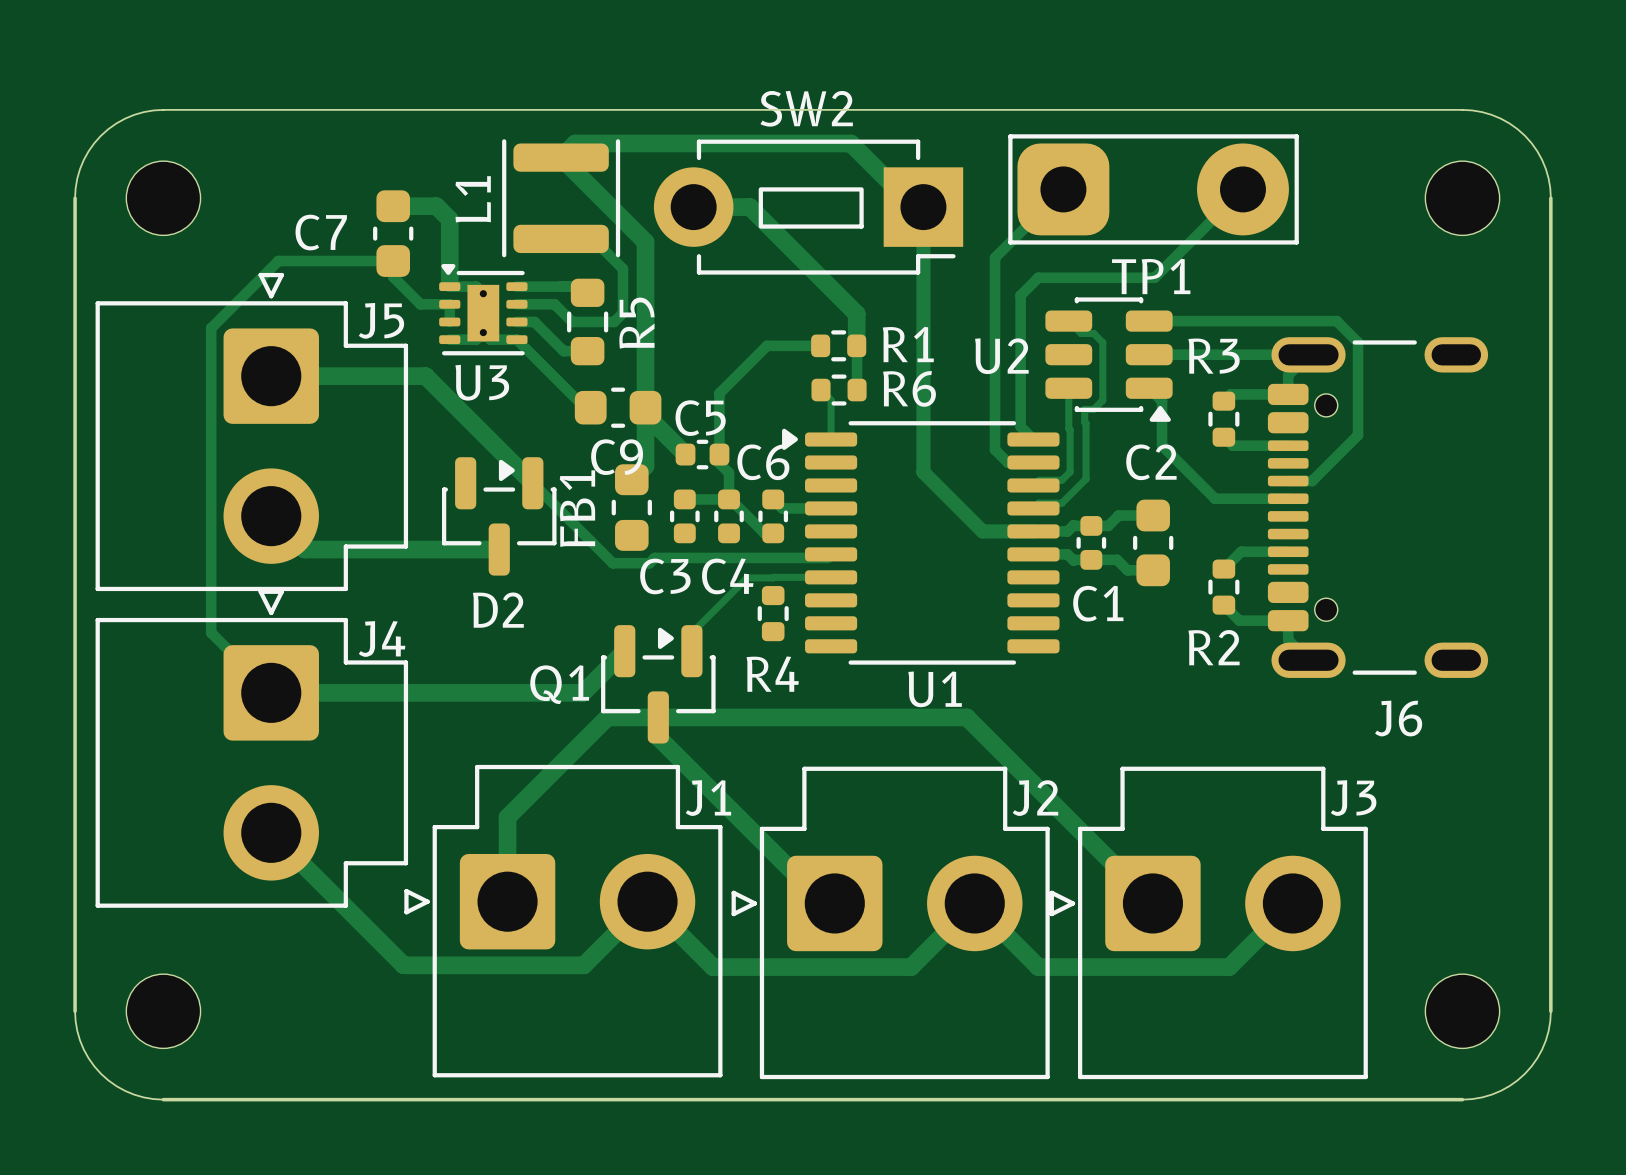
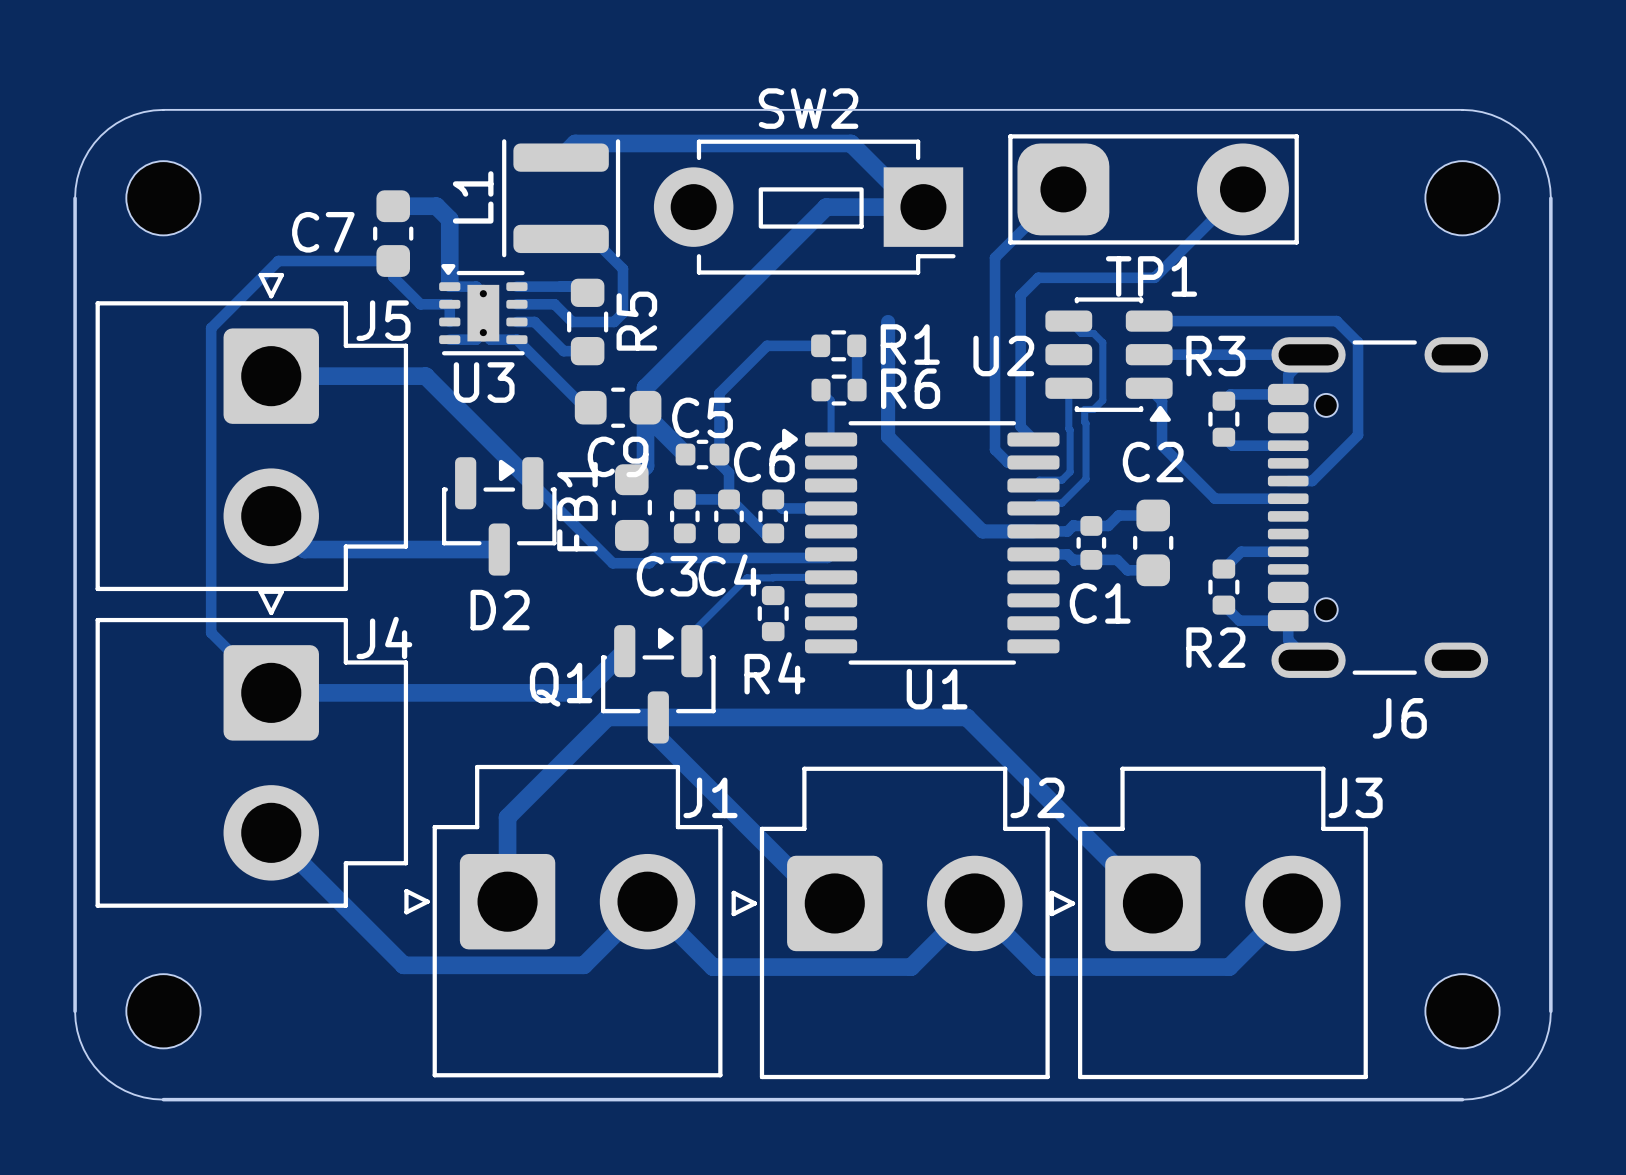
track: (561, 157) (645, 242) (645, 387) -> (914, 207) (826, 207) (645, 387)
track: (693, 207) (749, 207) (856, 313) (856, 345) -> none
track: (914, 207) (923, 207) (923, 472) -> (888, 321) (888, 436) (923, 472)

